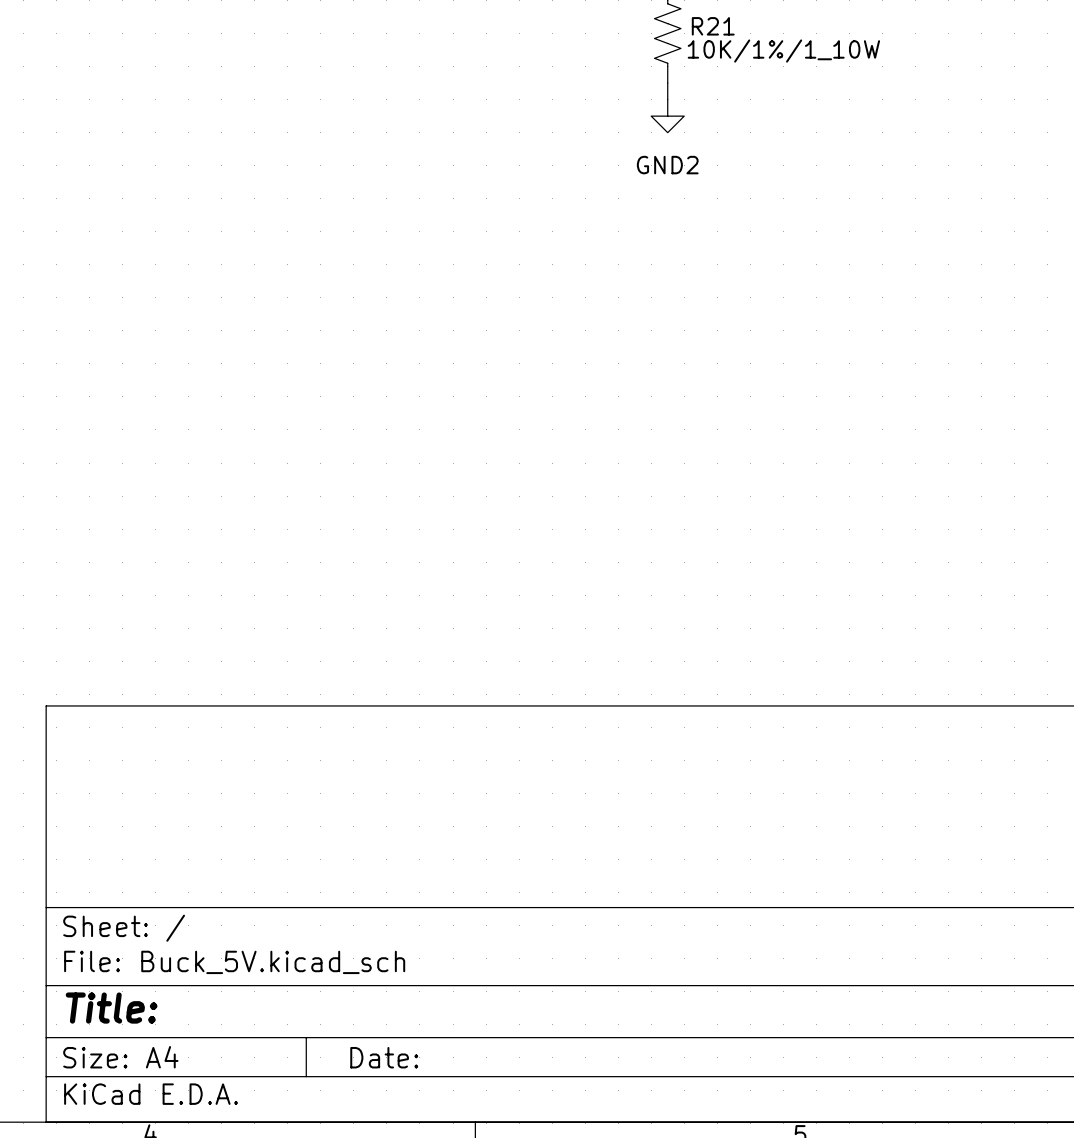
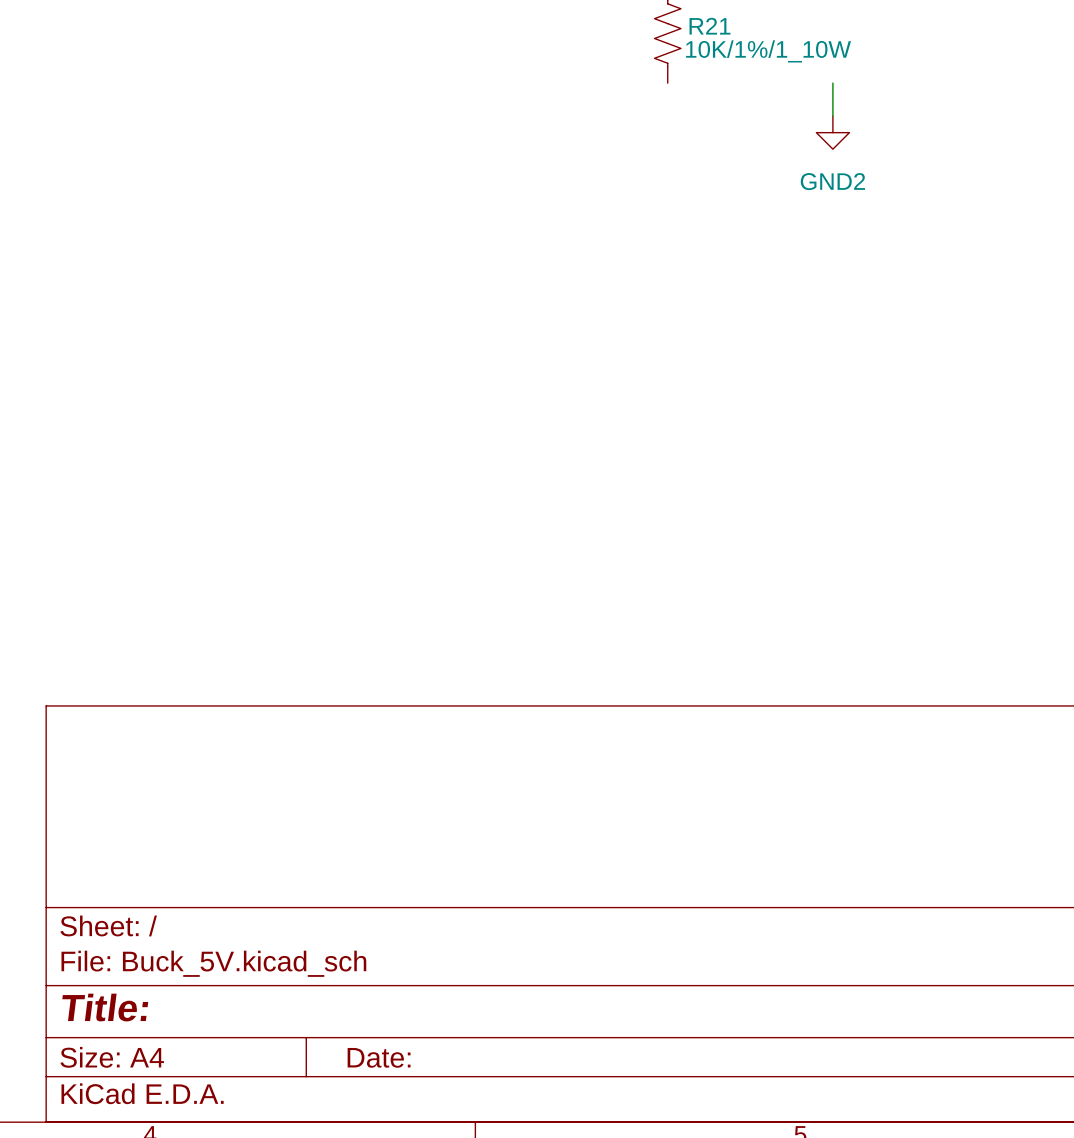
wire: (667, 83) (667, 99) -> none
wire: none -> (832, 83) (832, 116)
power symbol position: GND2 (667, 116) -> GND2 (832, 132)

